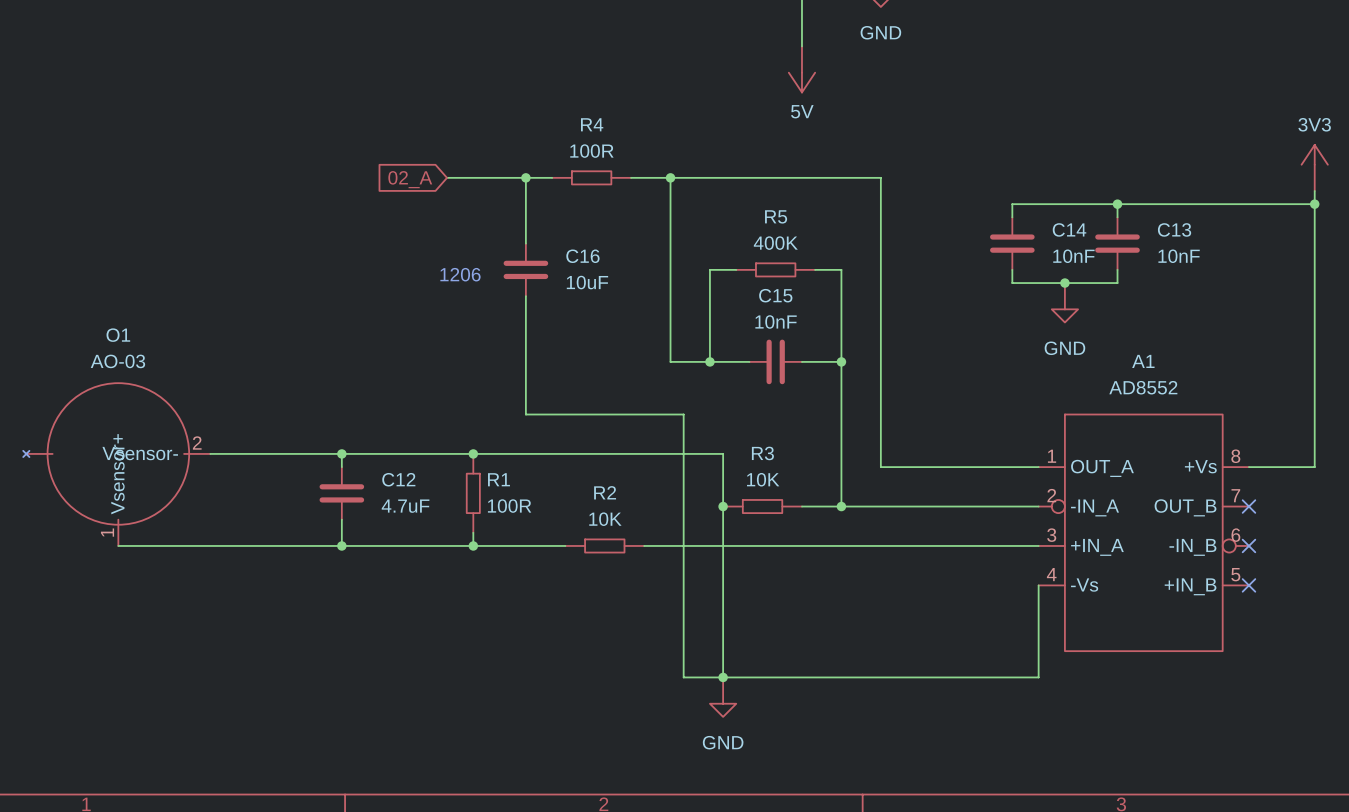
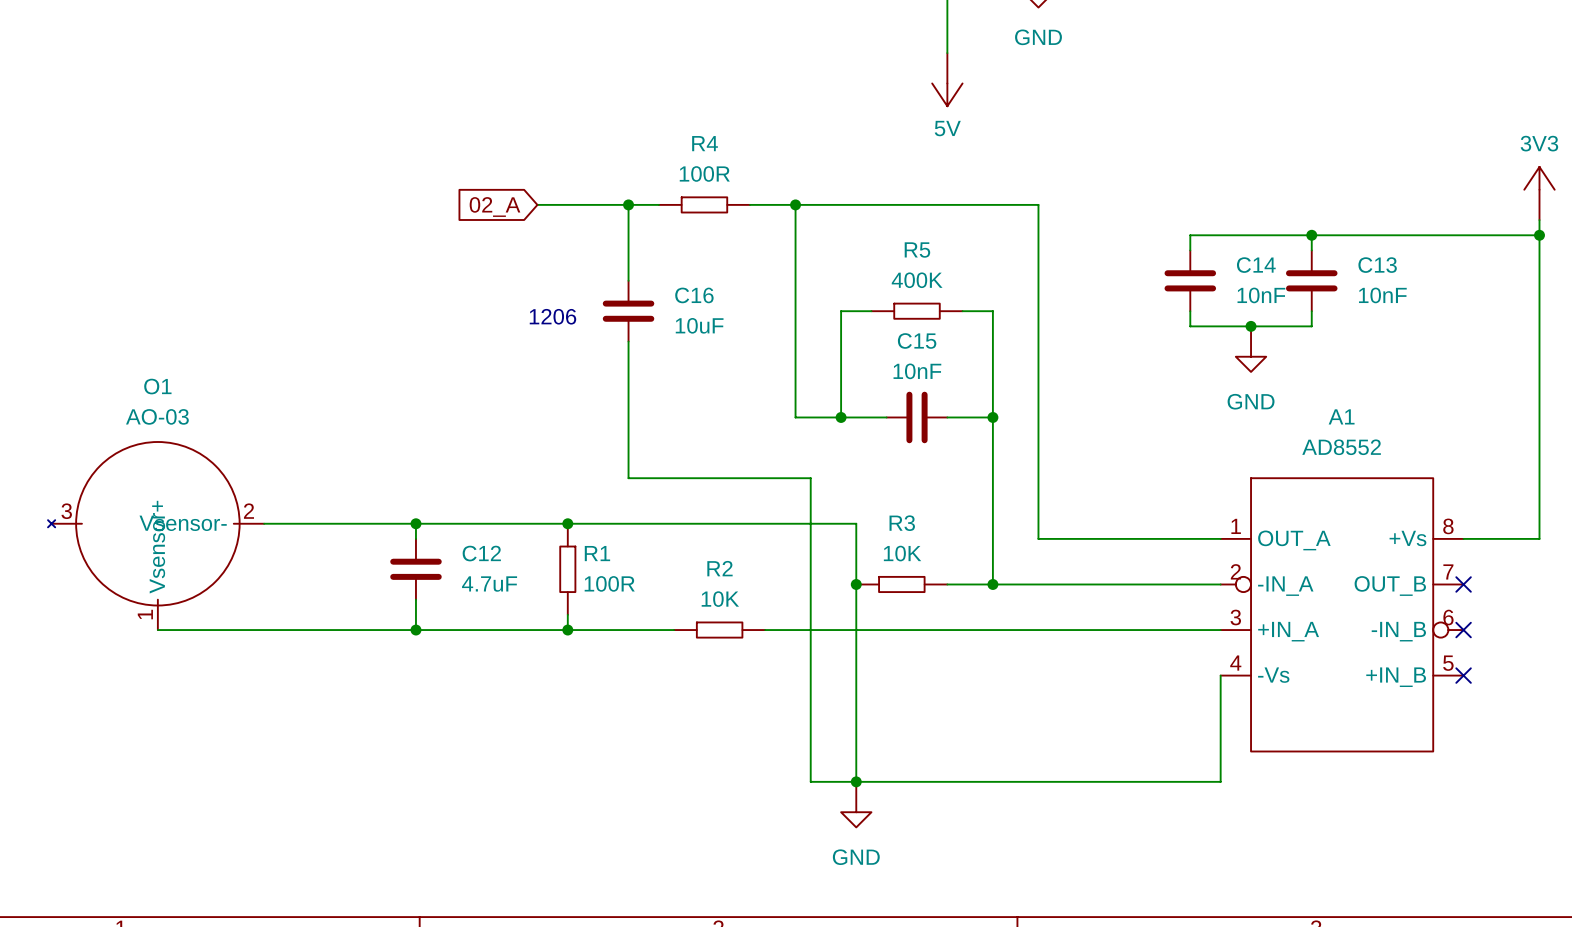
O1 pin number: none -> 3 (66, 511)

